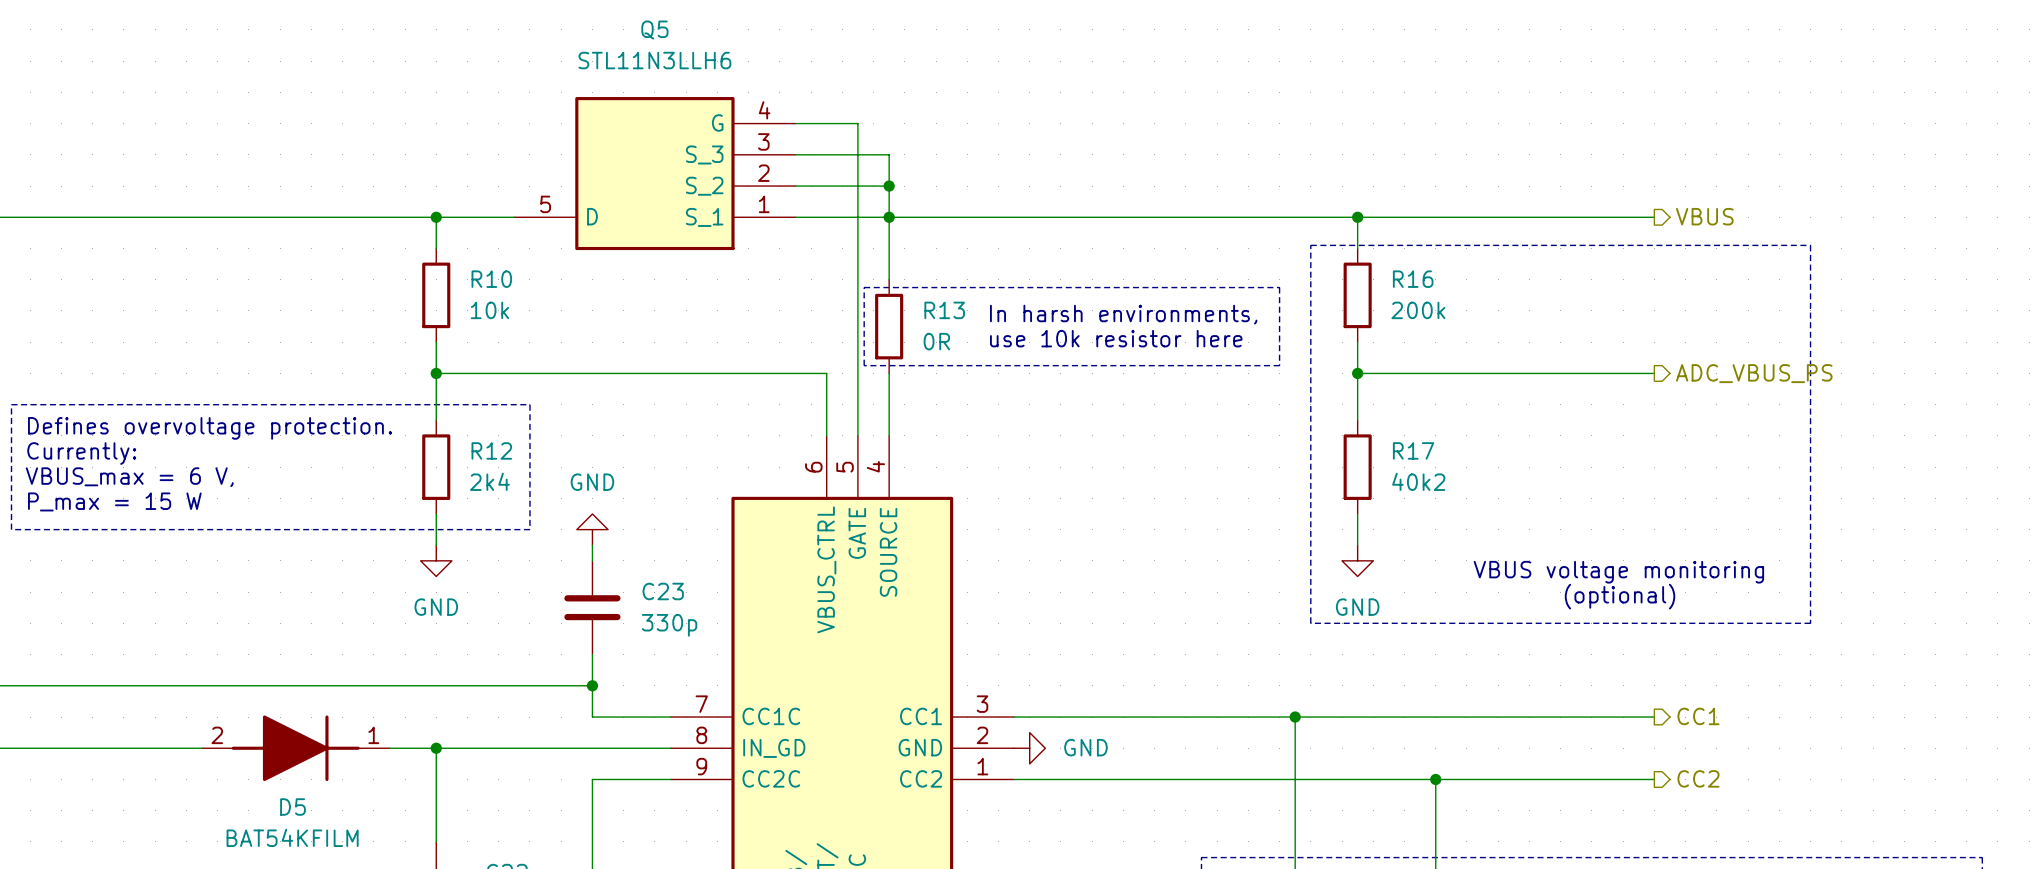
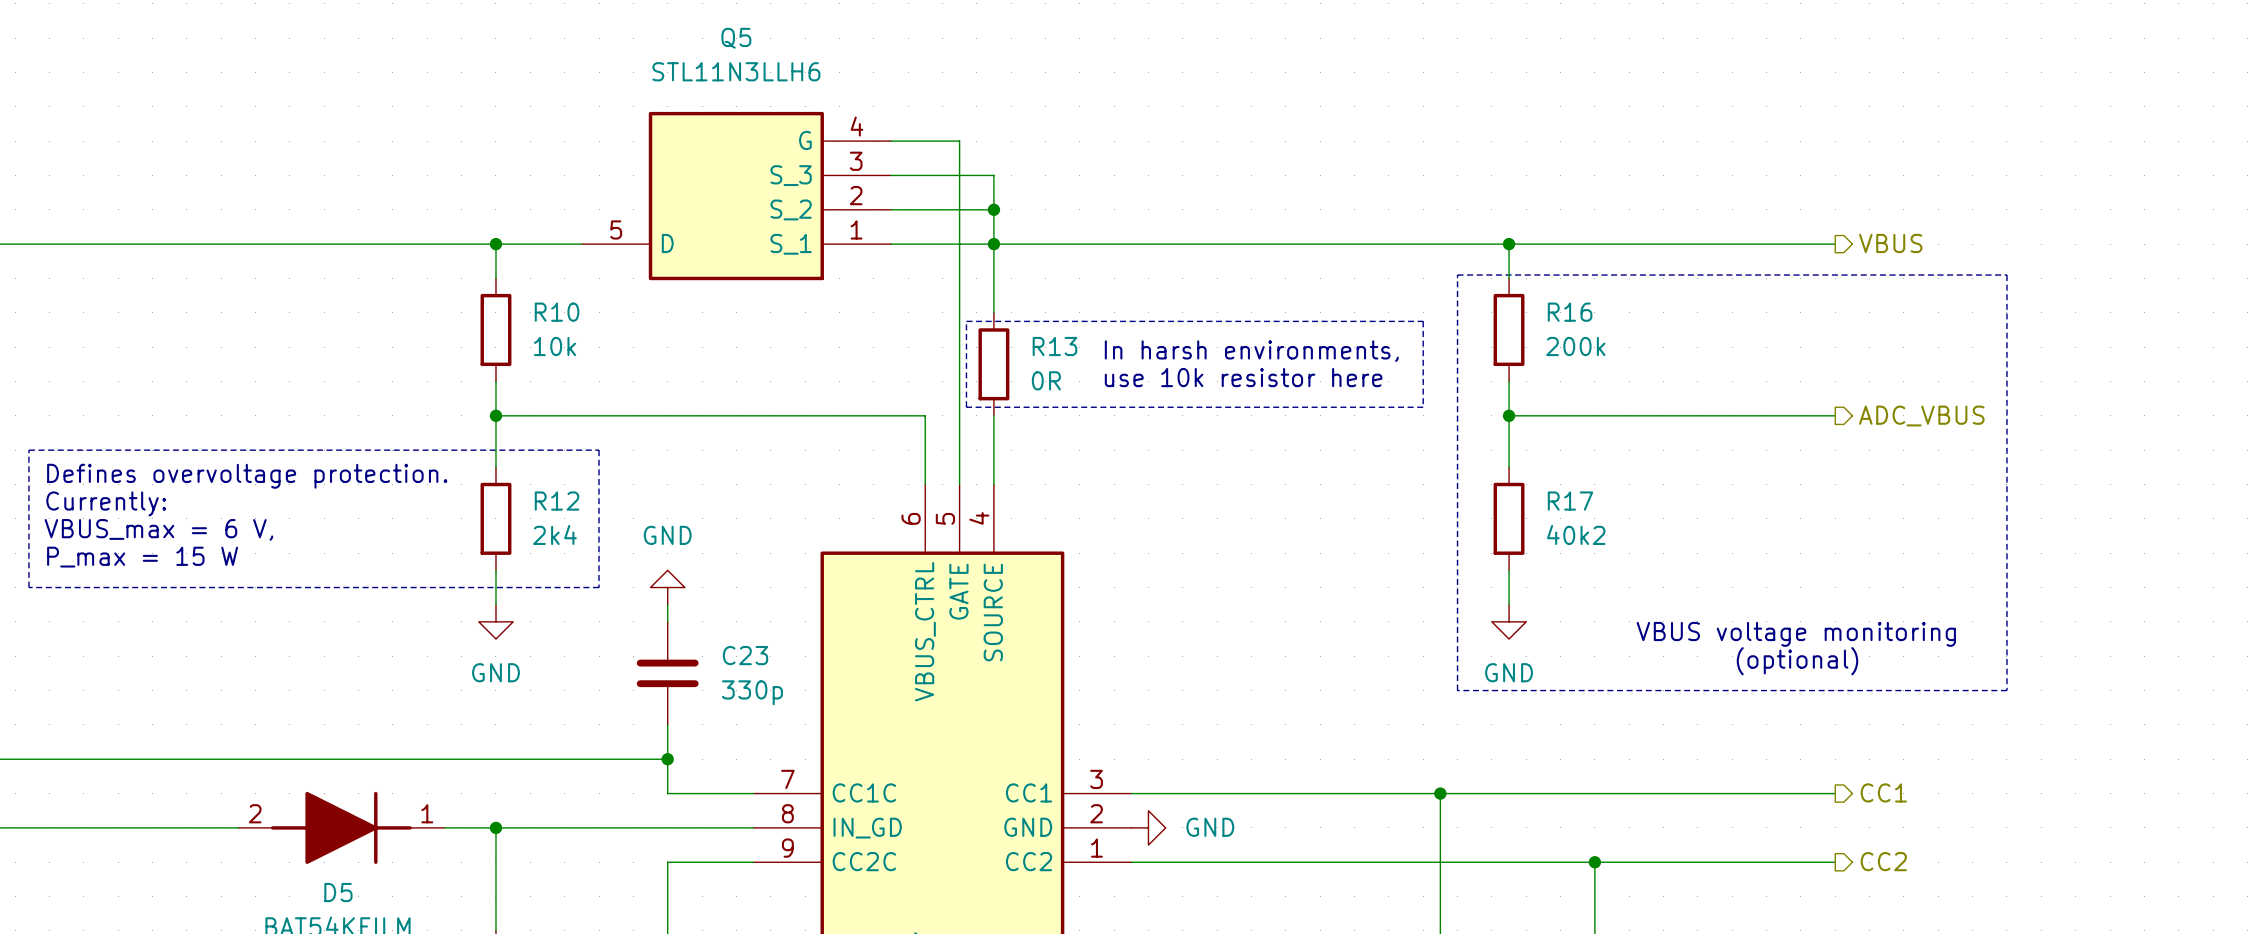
hierarchical label: ADC_VBUS_PS (1754, 373) -> ADC_VBUS (1921, 416)

